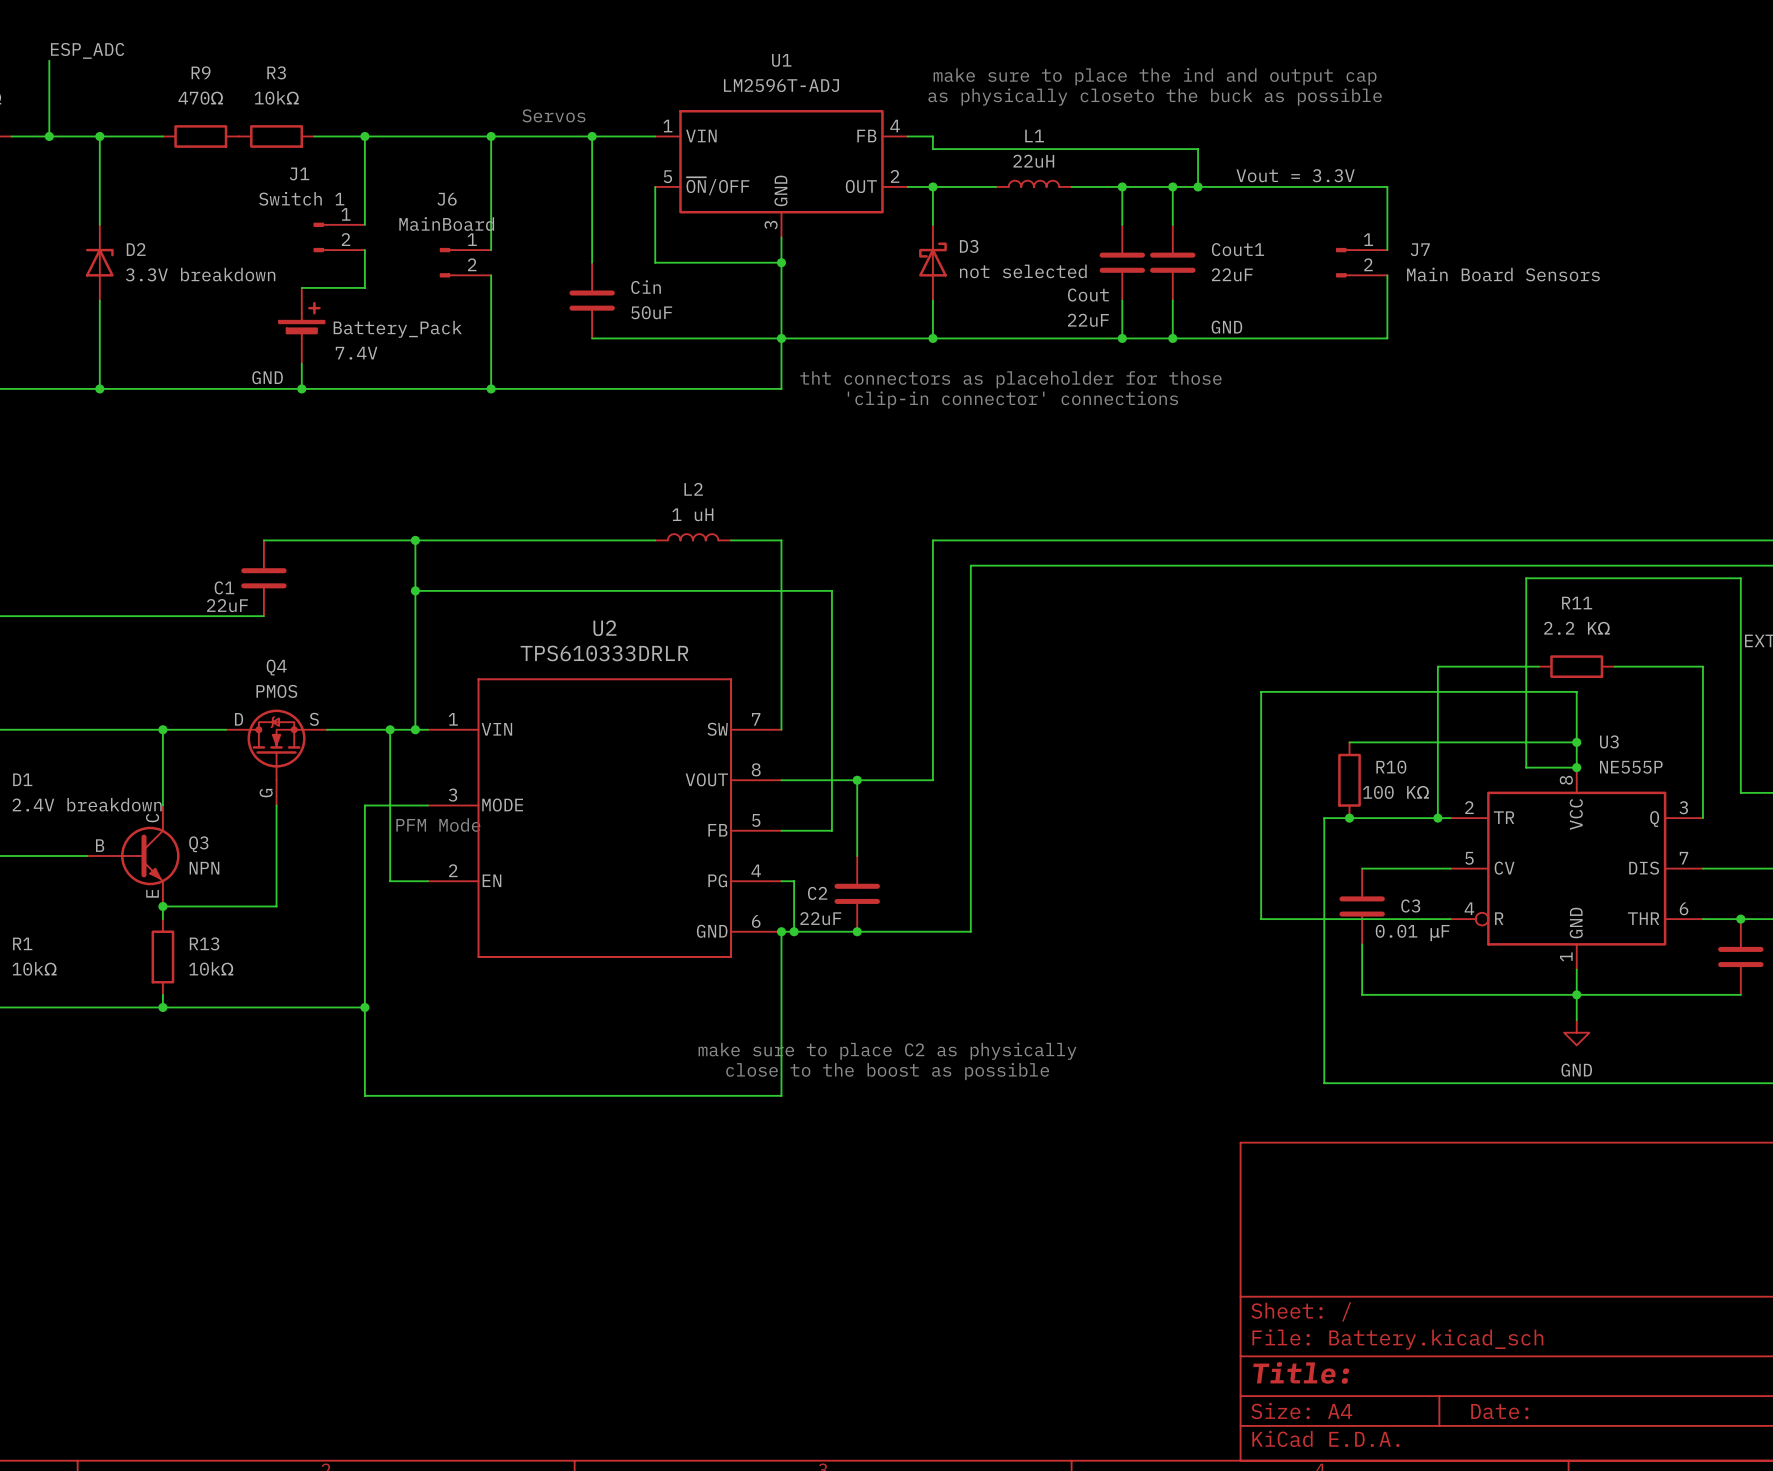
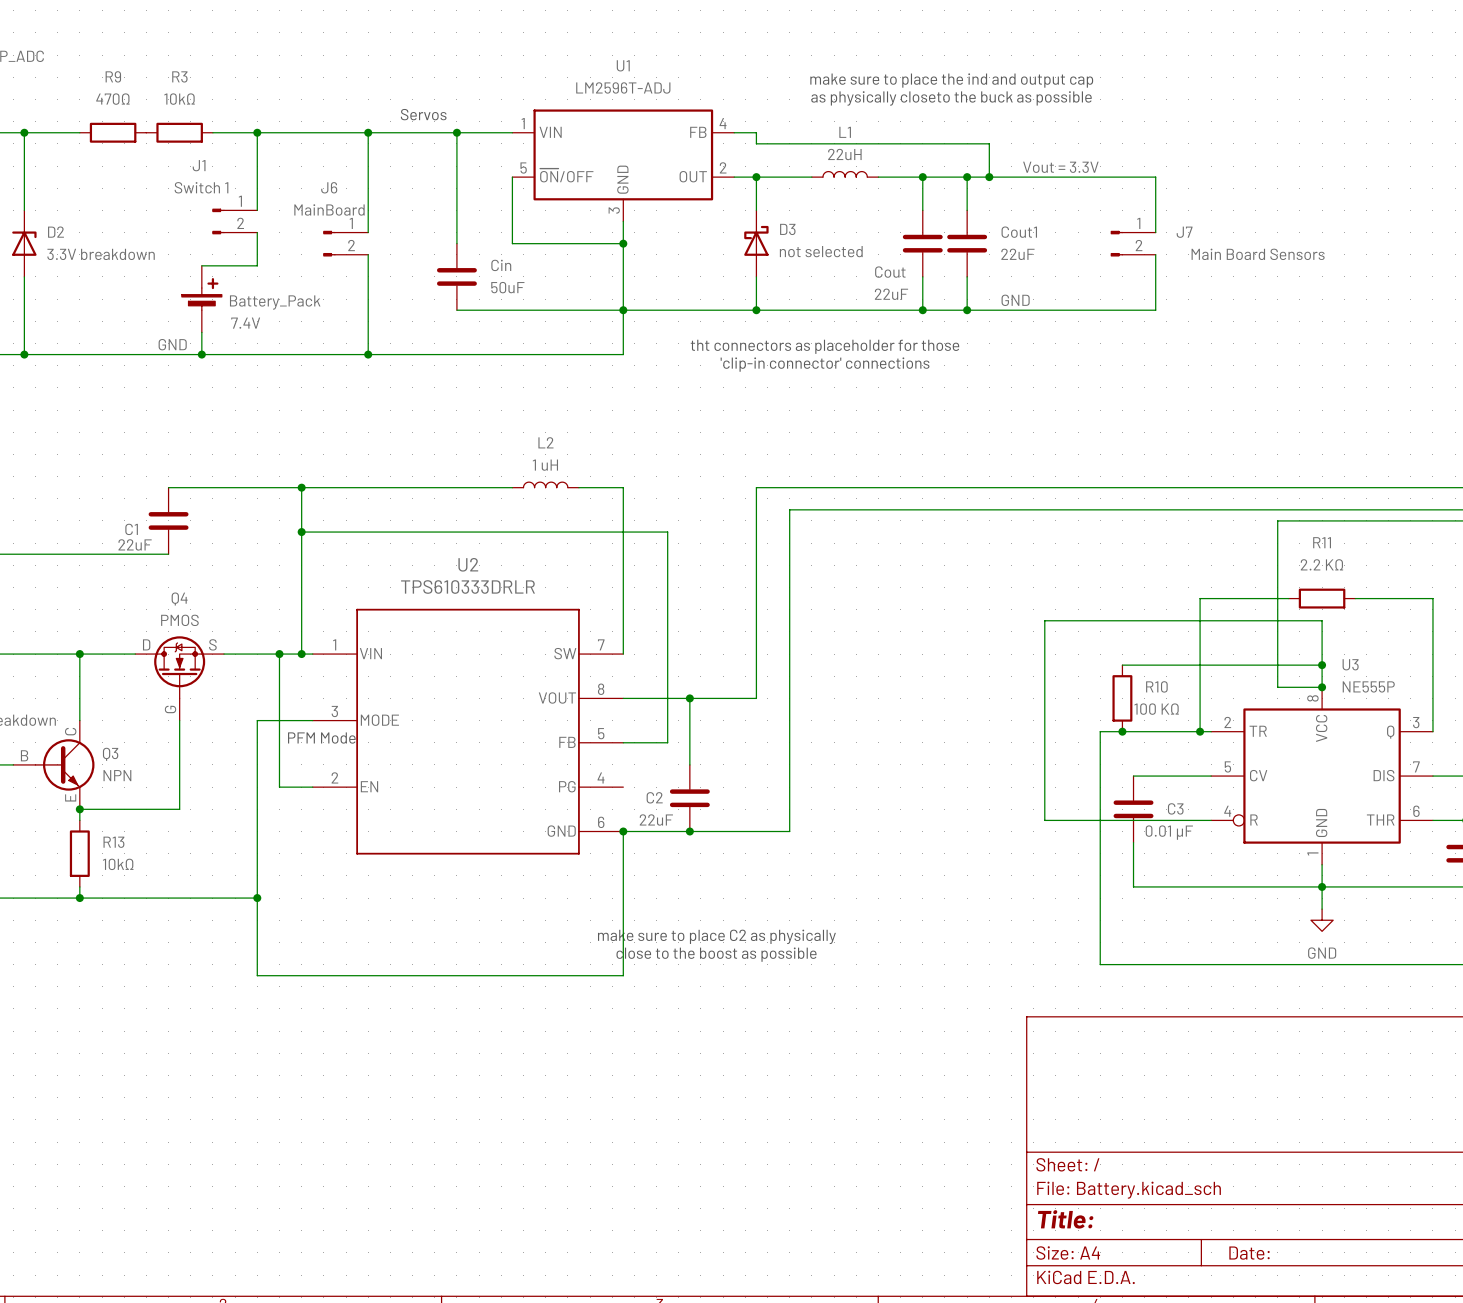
wire: (781, 881) (794, 881) (794, 931) -> none
junction: (794, 931) -> none

